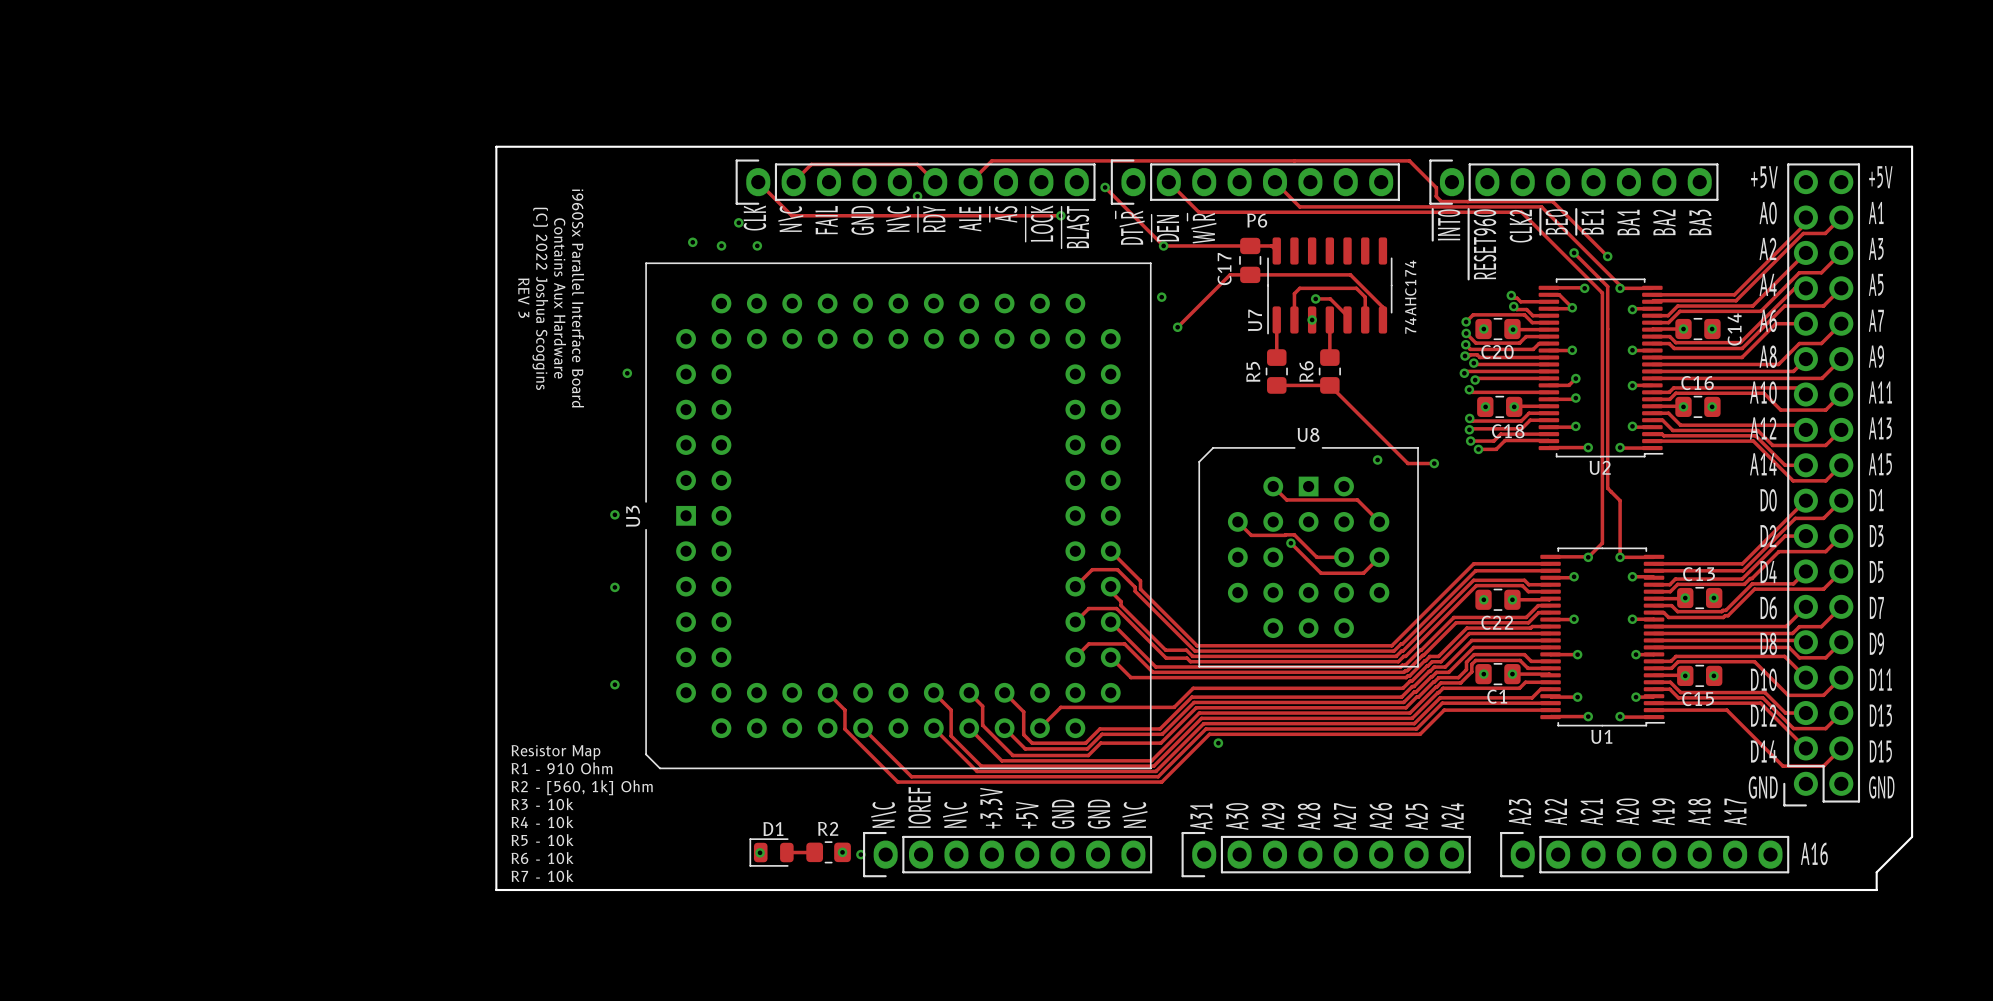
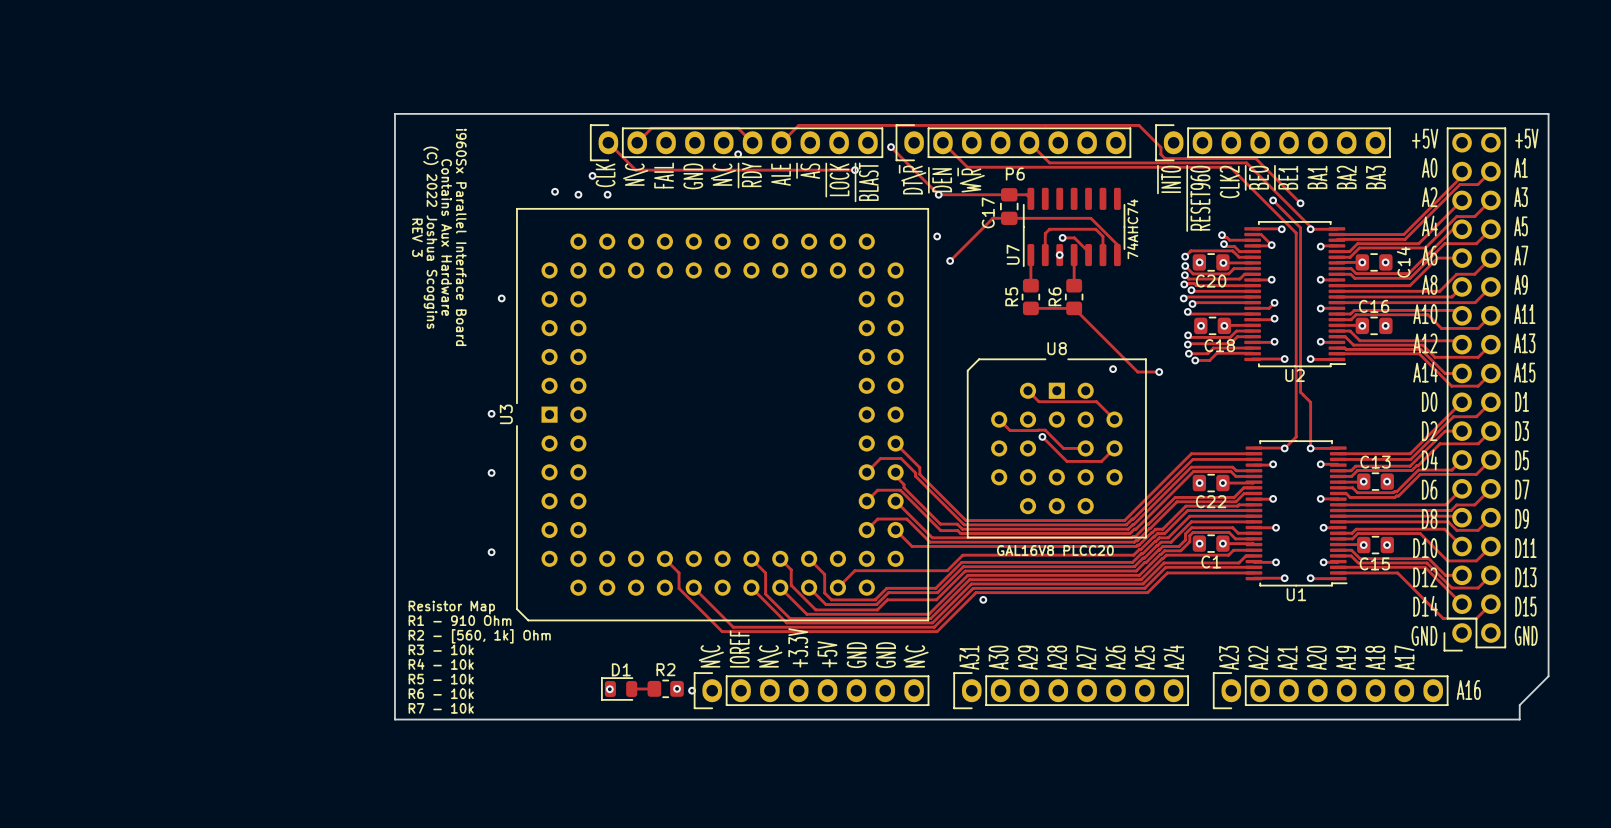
text: 74AHC174 (1410, 297) -> 74AHC74 (1132, 229)
text: none -> GAL16V8 PLCC20 (1055, 550)

